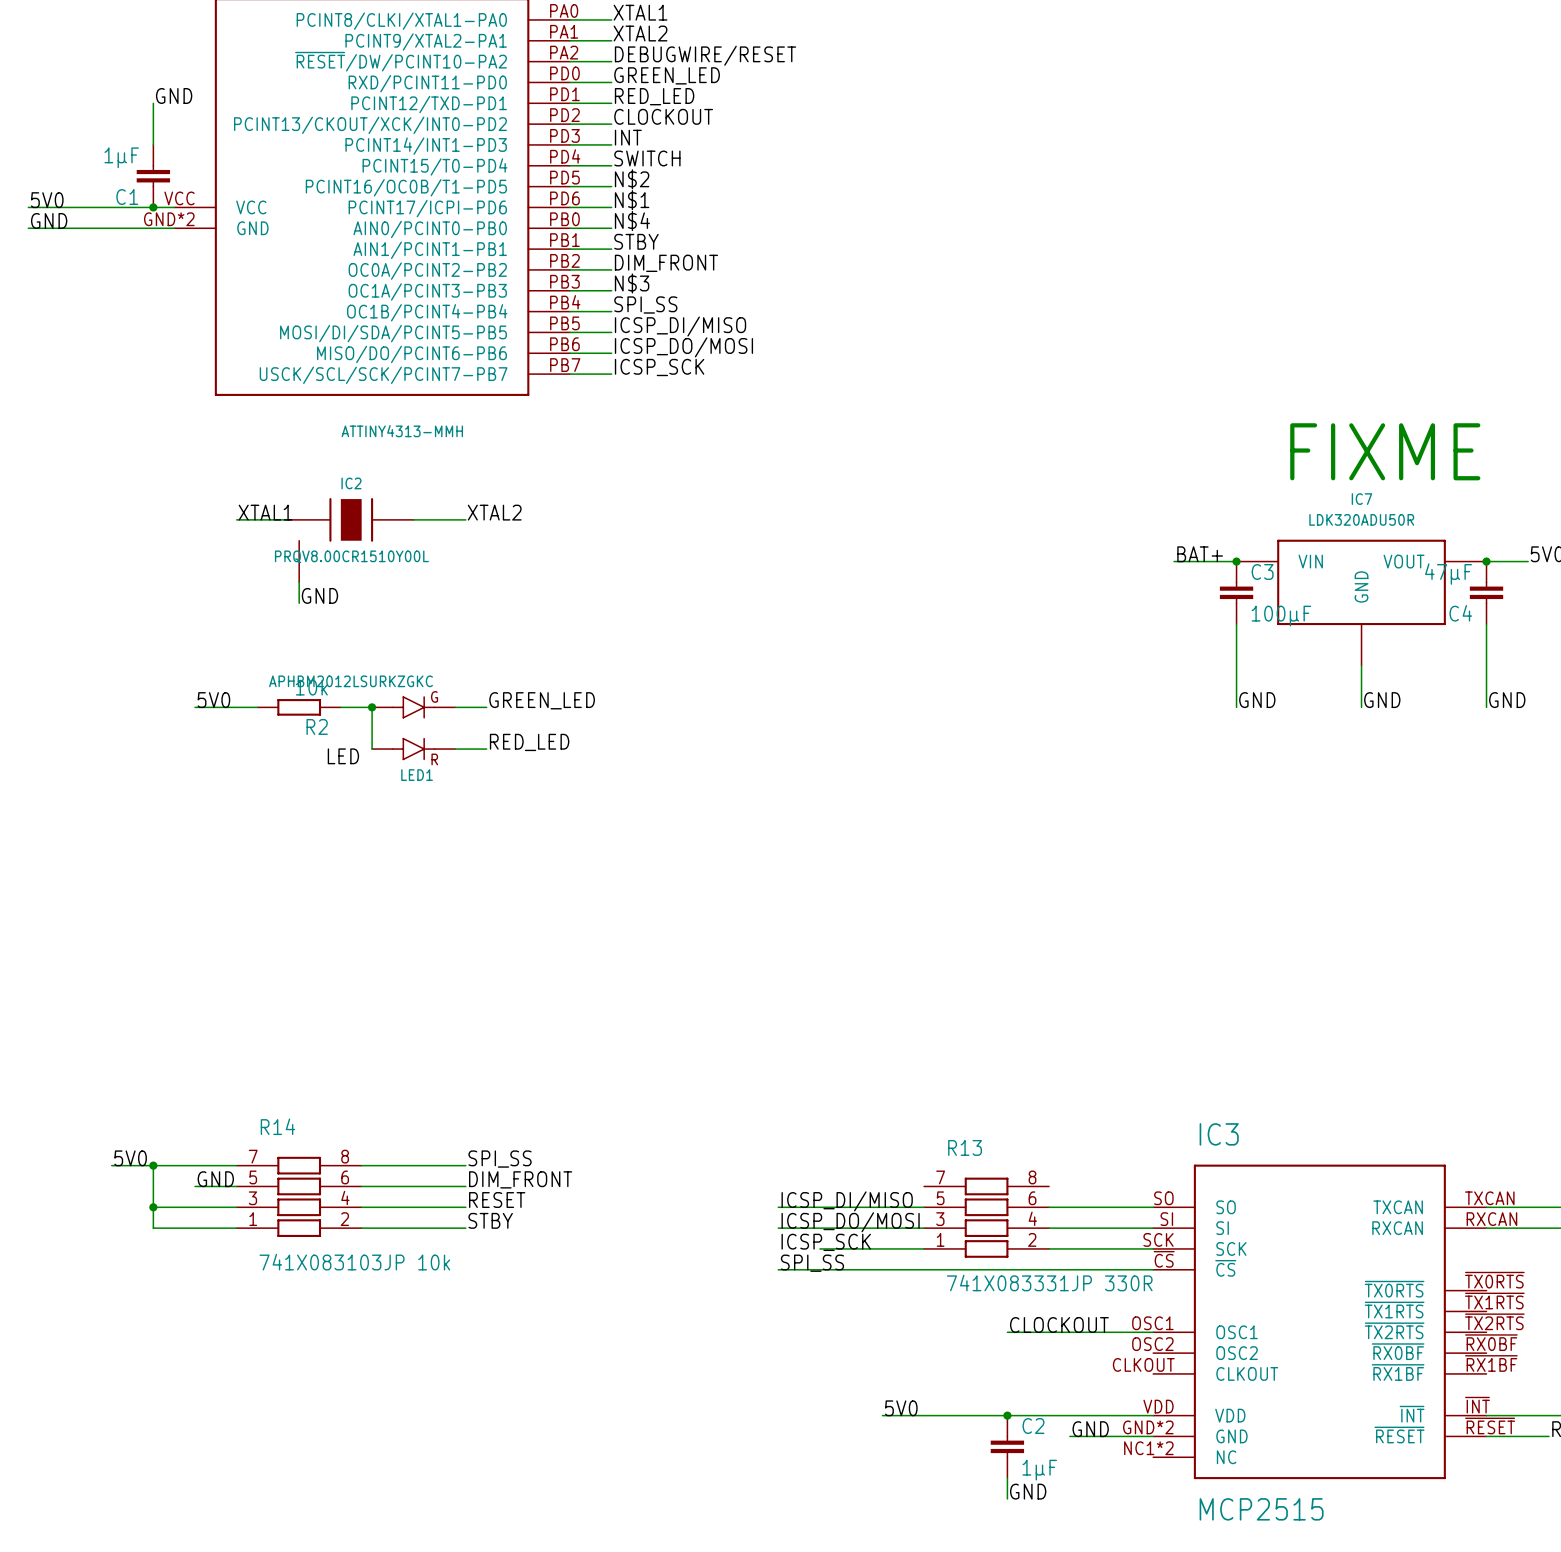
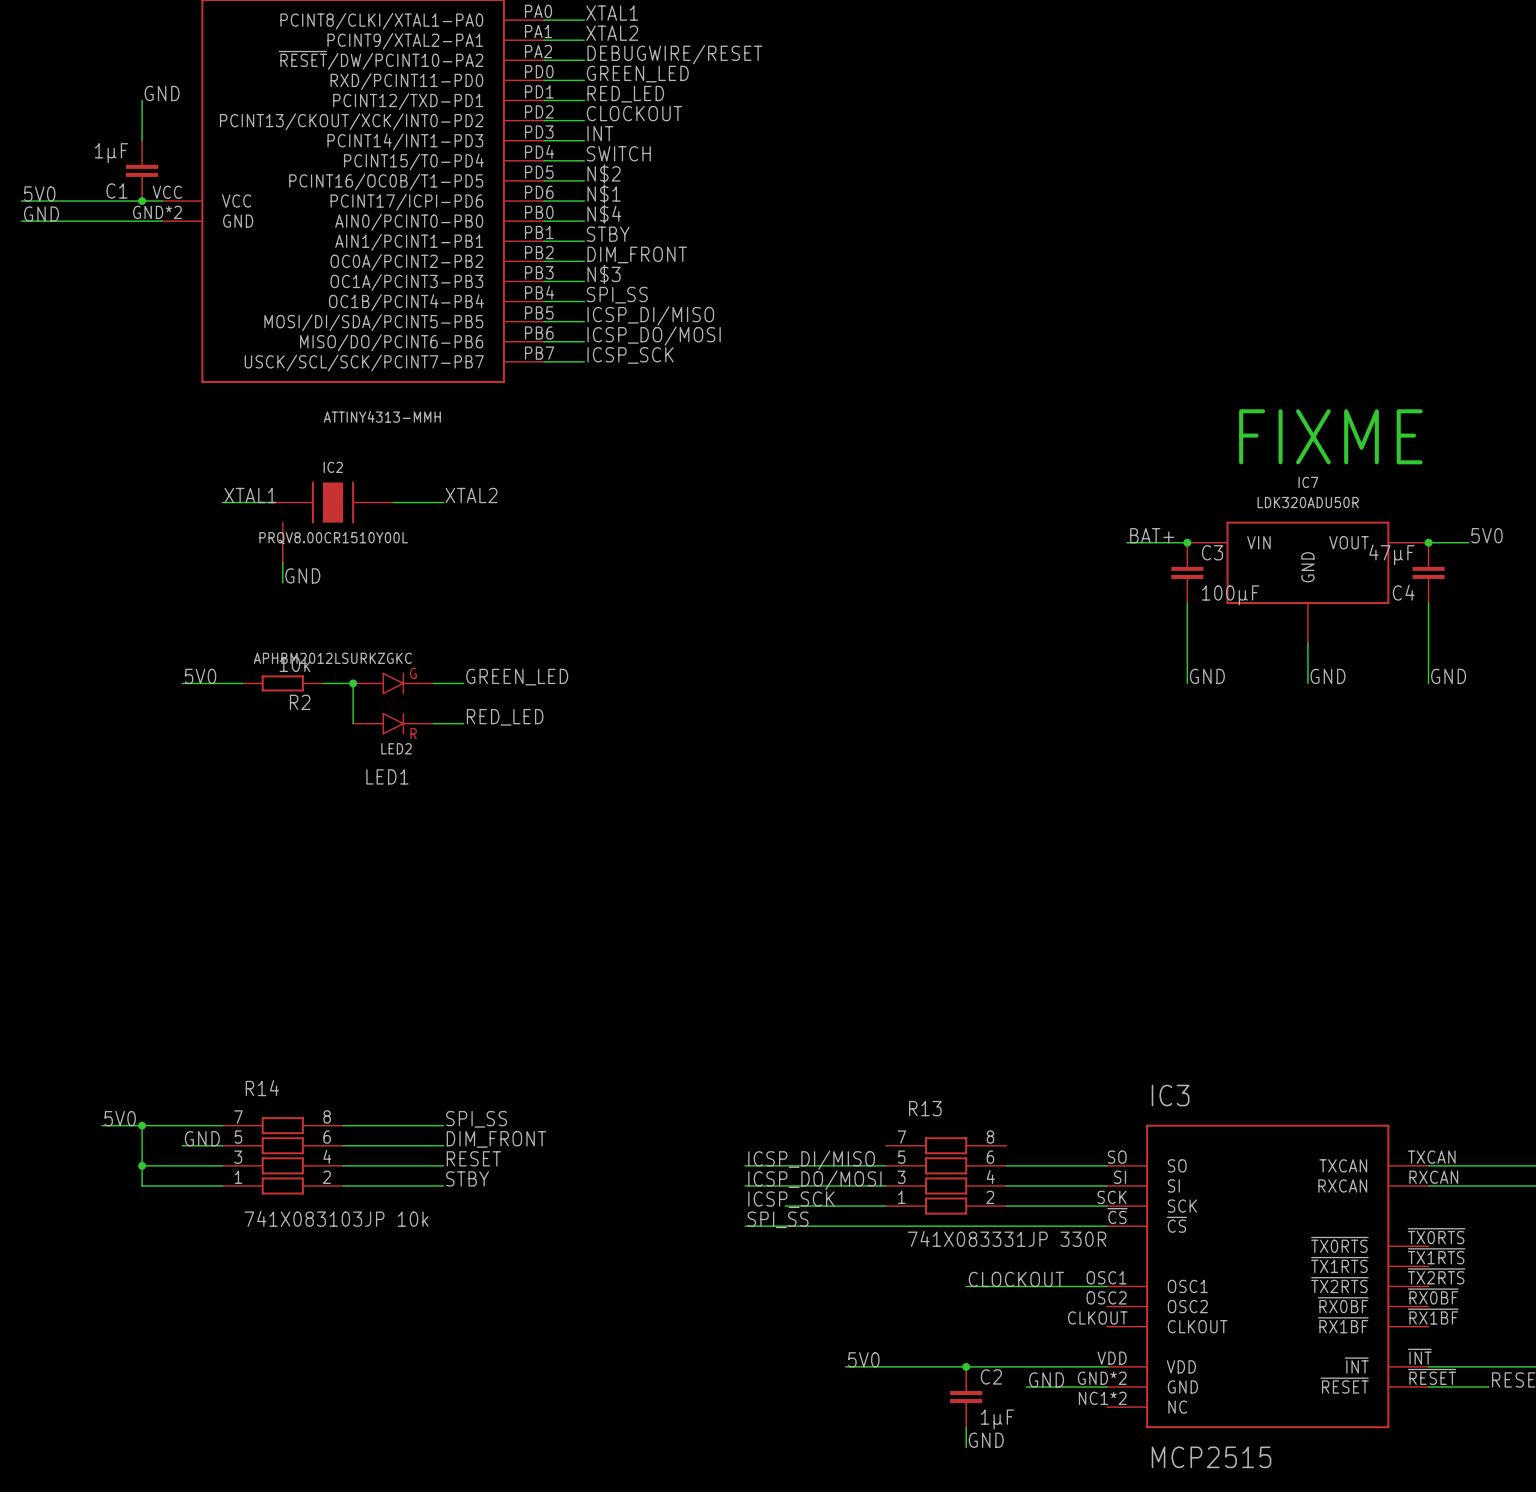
label: LED (343, 756) -> none
LED1 name: LED1 (417, 775) -> LED2 (396, 748)
label: none -> LED1 (387, 776)

